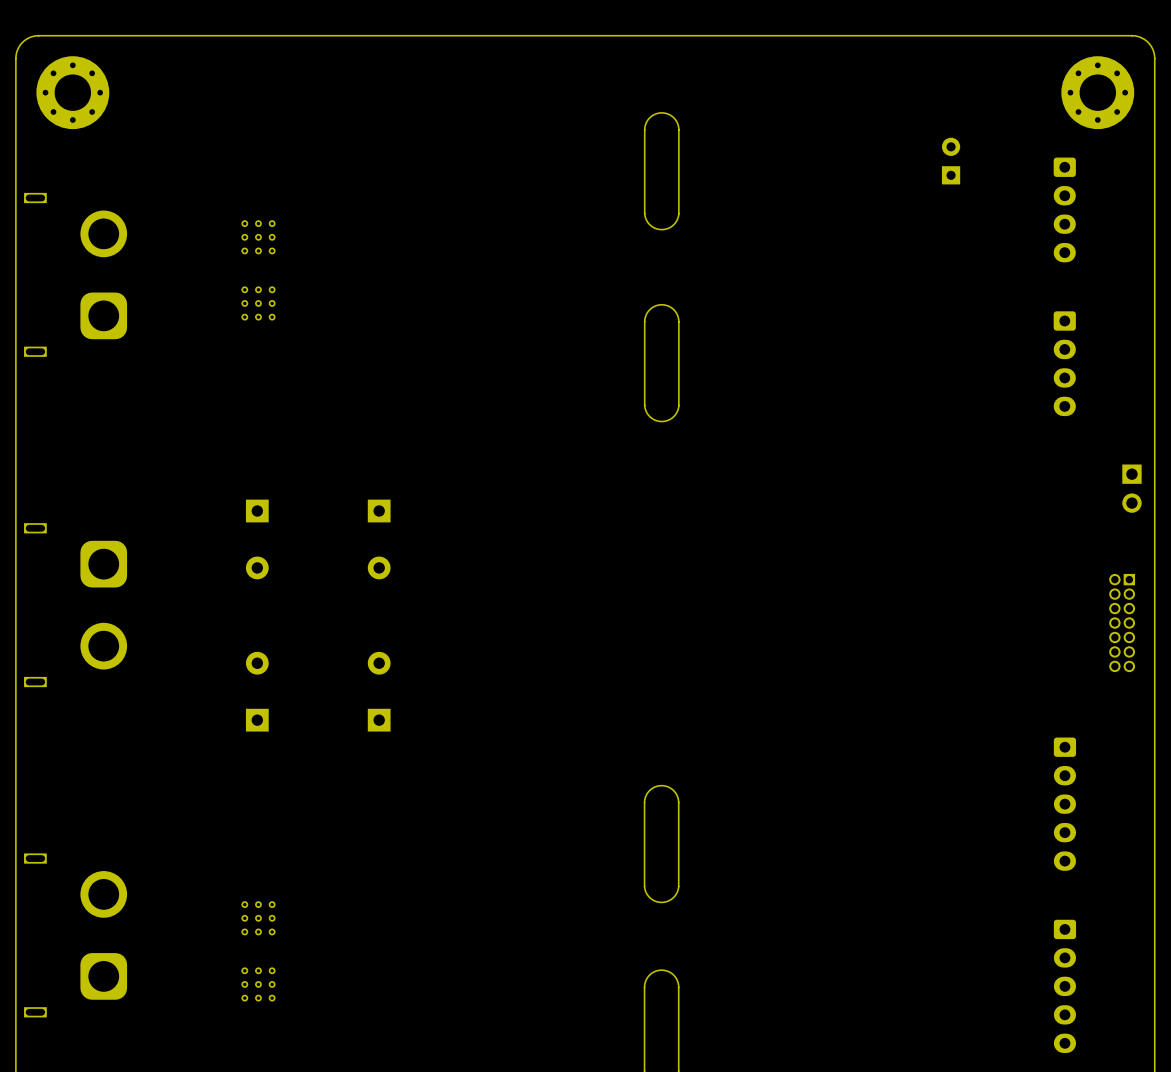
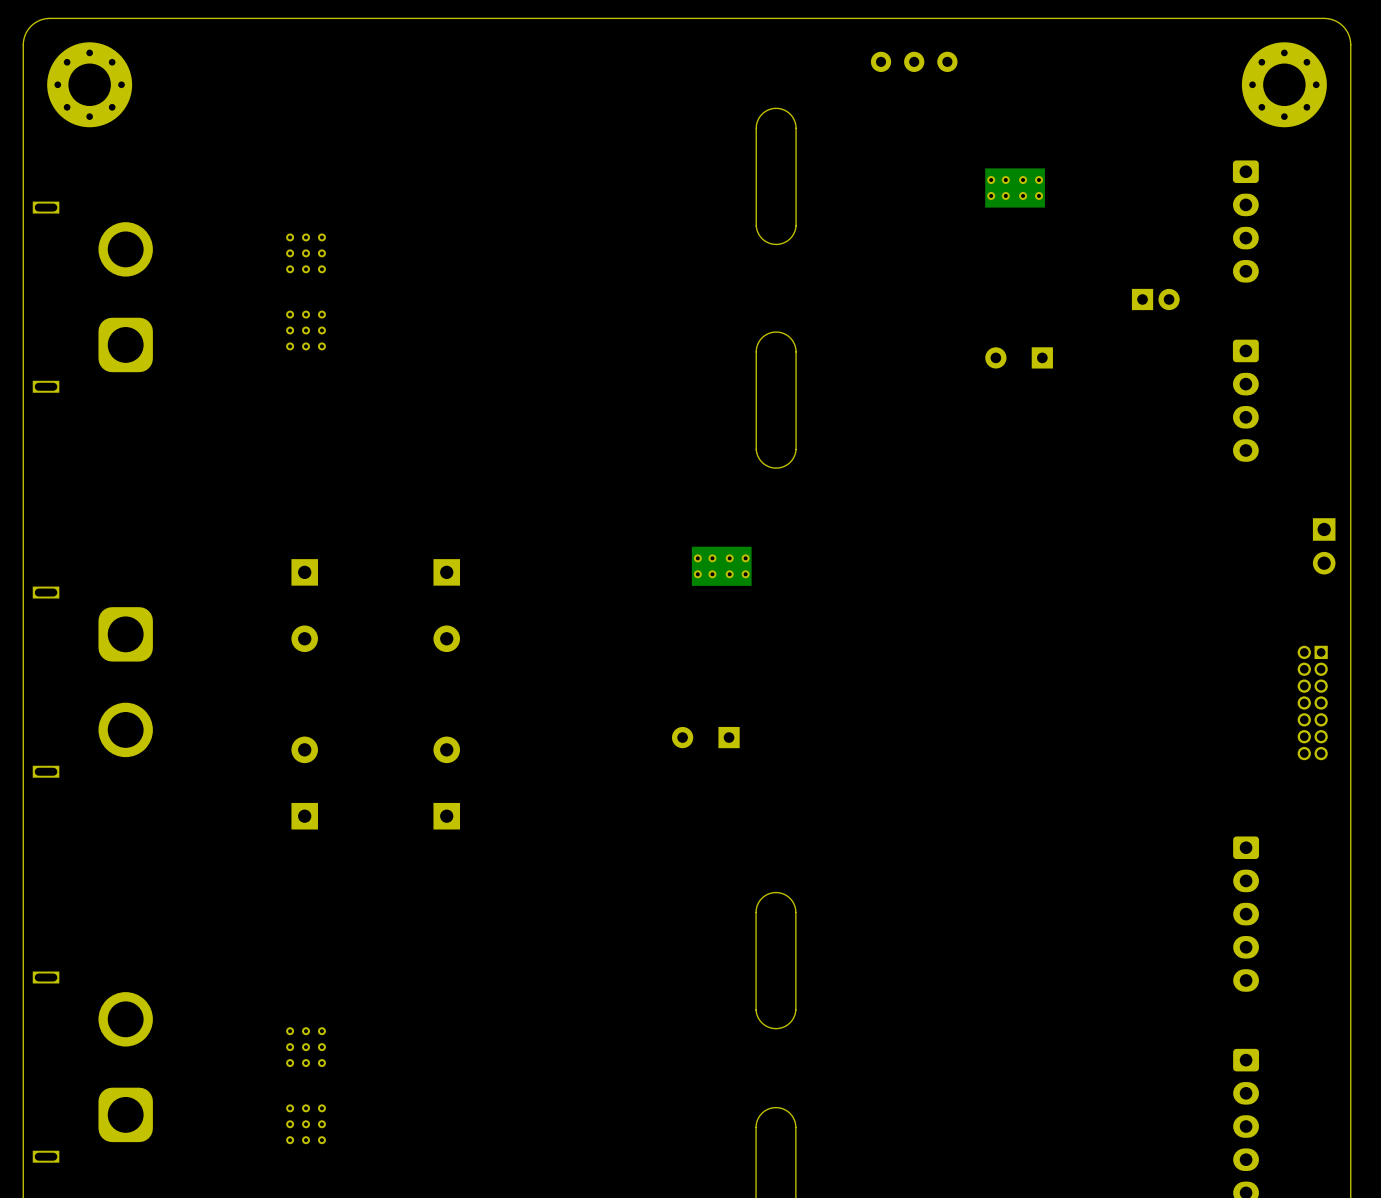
part: none -> (914, 61)
part: (951, 161) -> none
part: none -> (1015, 187)
part: none -> (1155, 299)
part: none -> (1019, 357)
part: none -> (721, 566)
part: none -> (705, 737)

